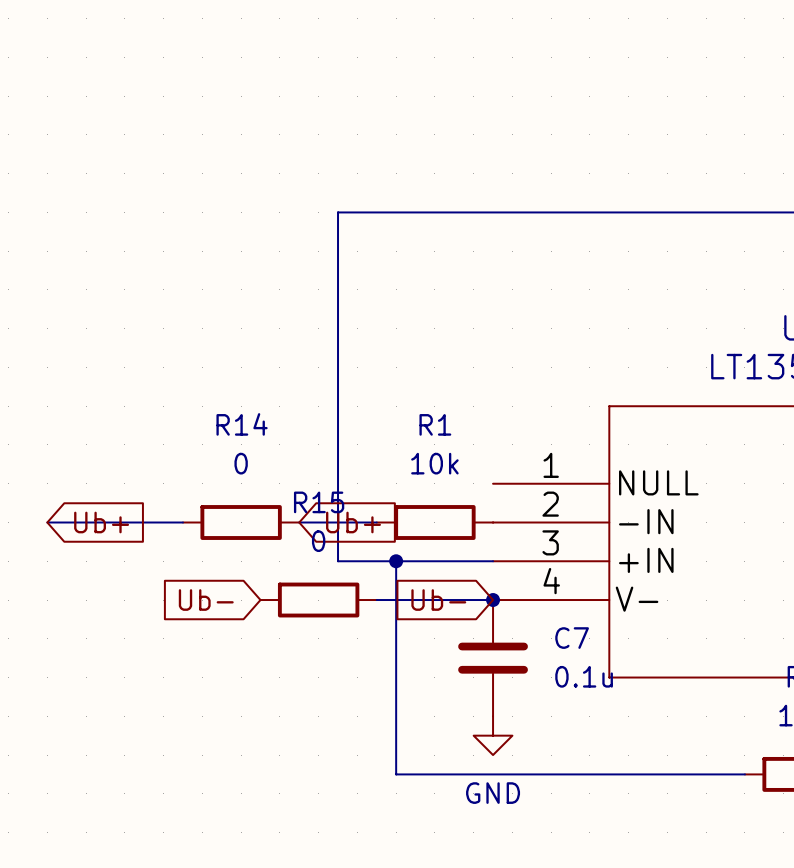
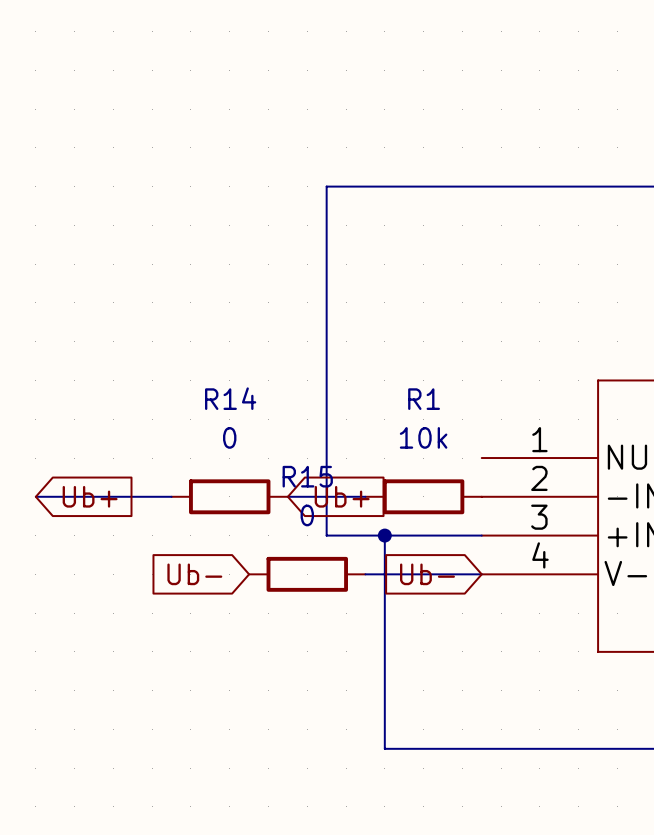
junction: (493, 600) -> none
C7: 0.1u (493, 658) -> none
power symbol: GND (493, 735) -> none

